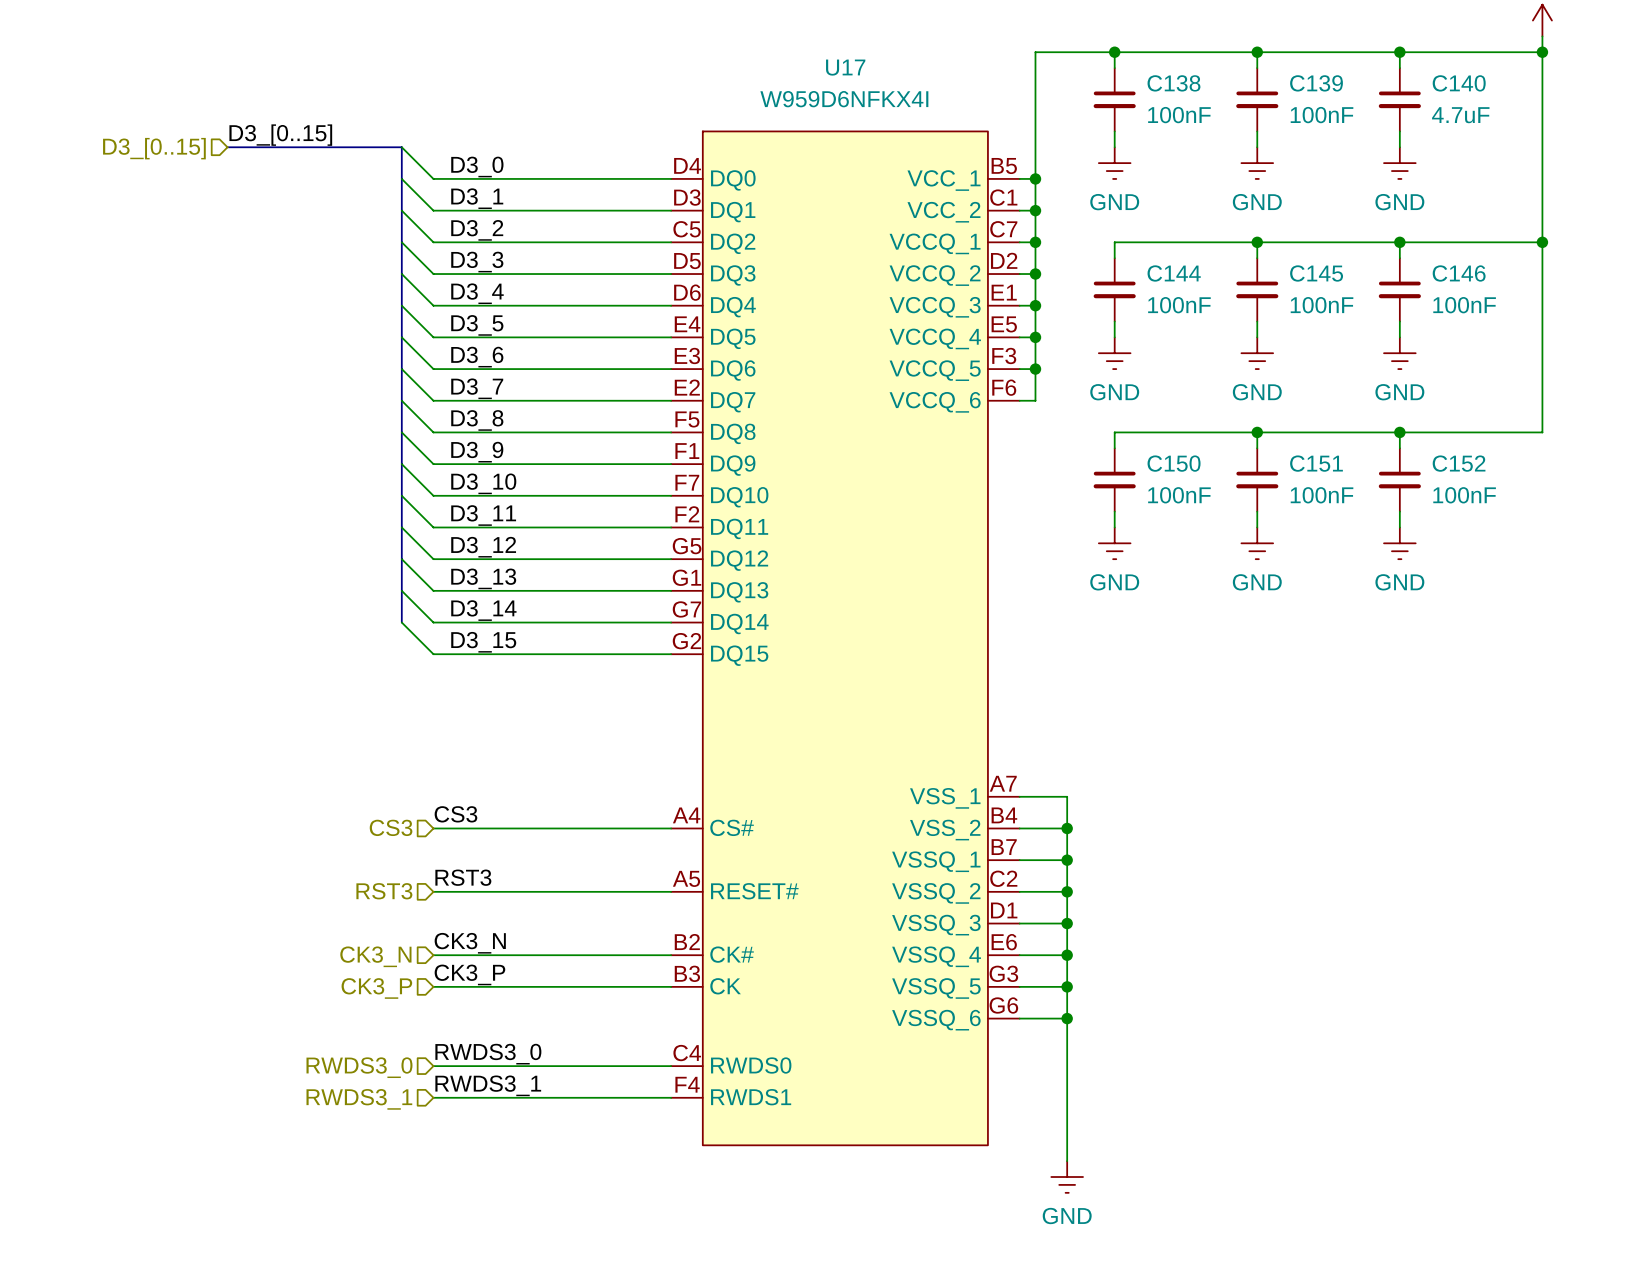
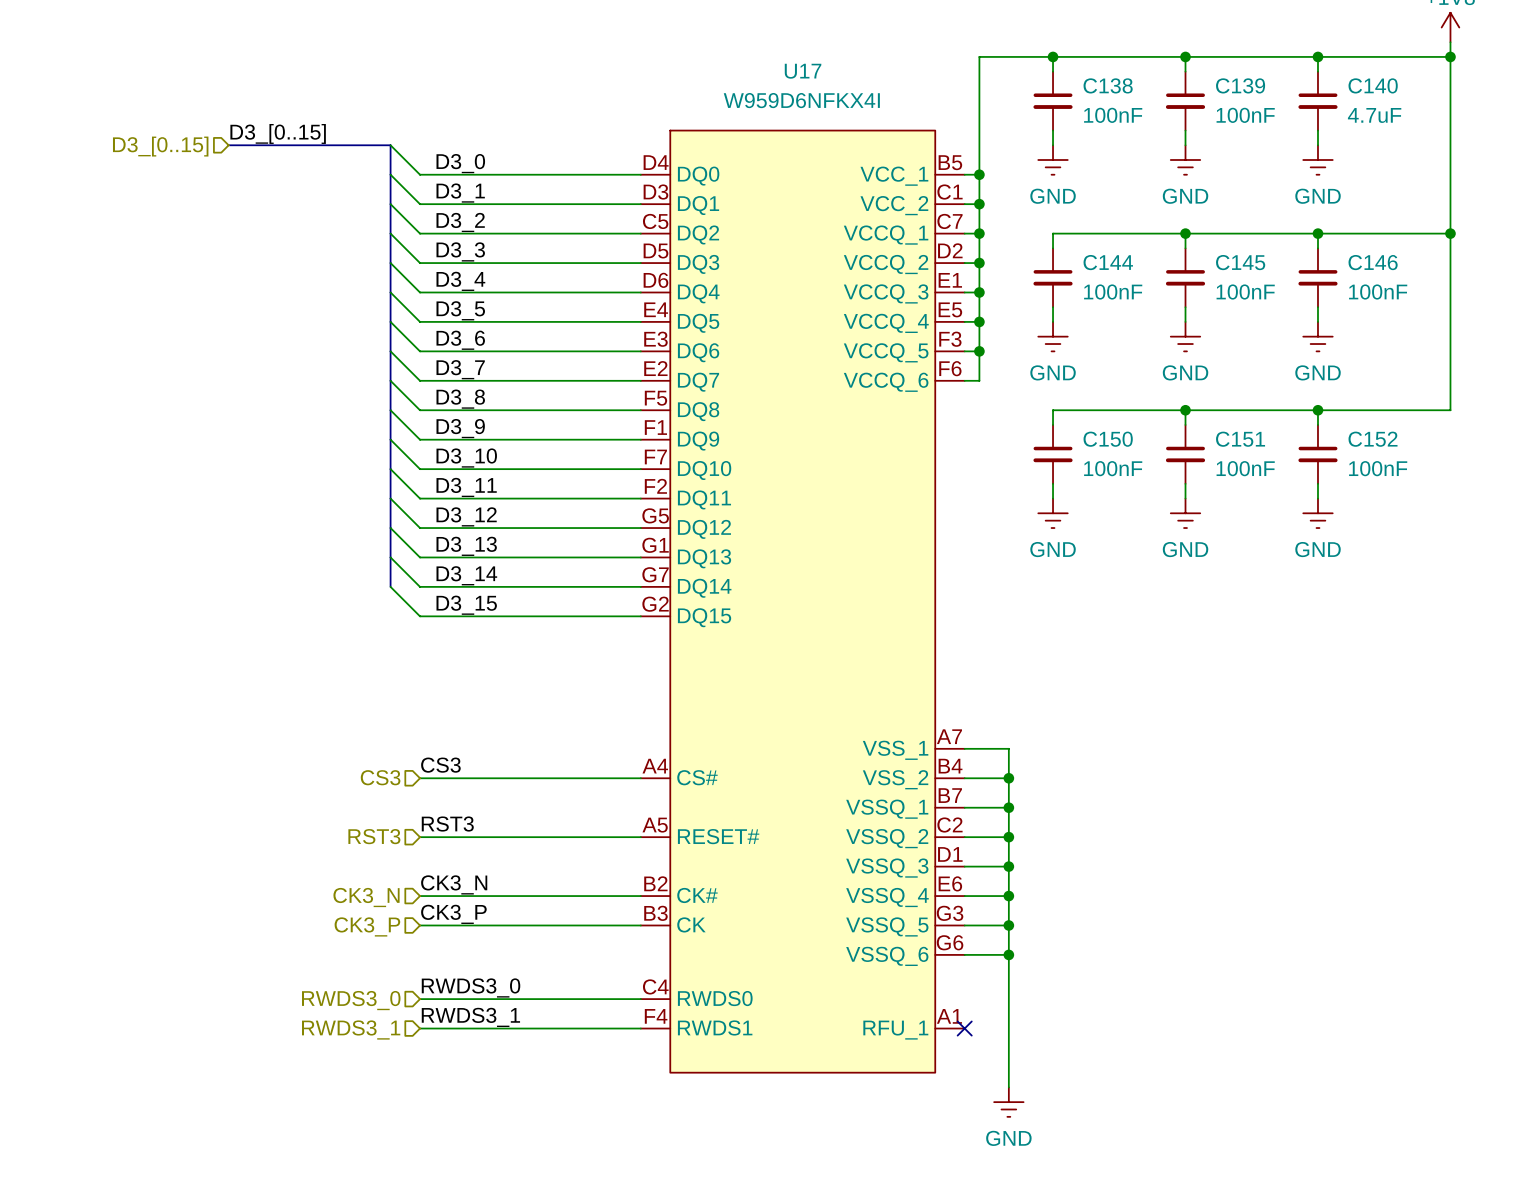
U17 symbol: [671, 131, 1020, 1146] -> [640, 130, 965, 1073]
no-connect mark: none -> (964, 1028)

